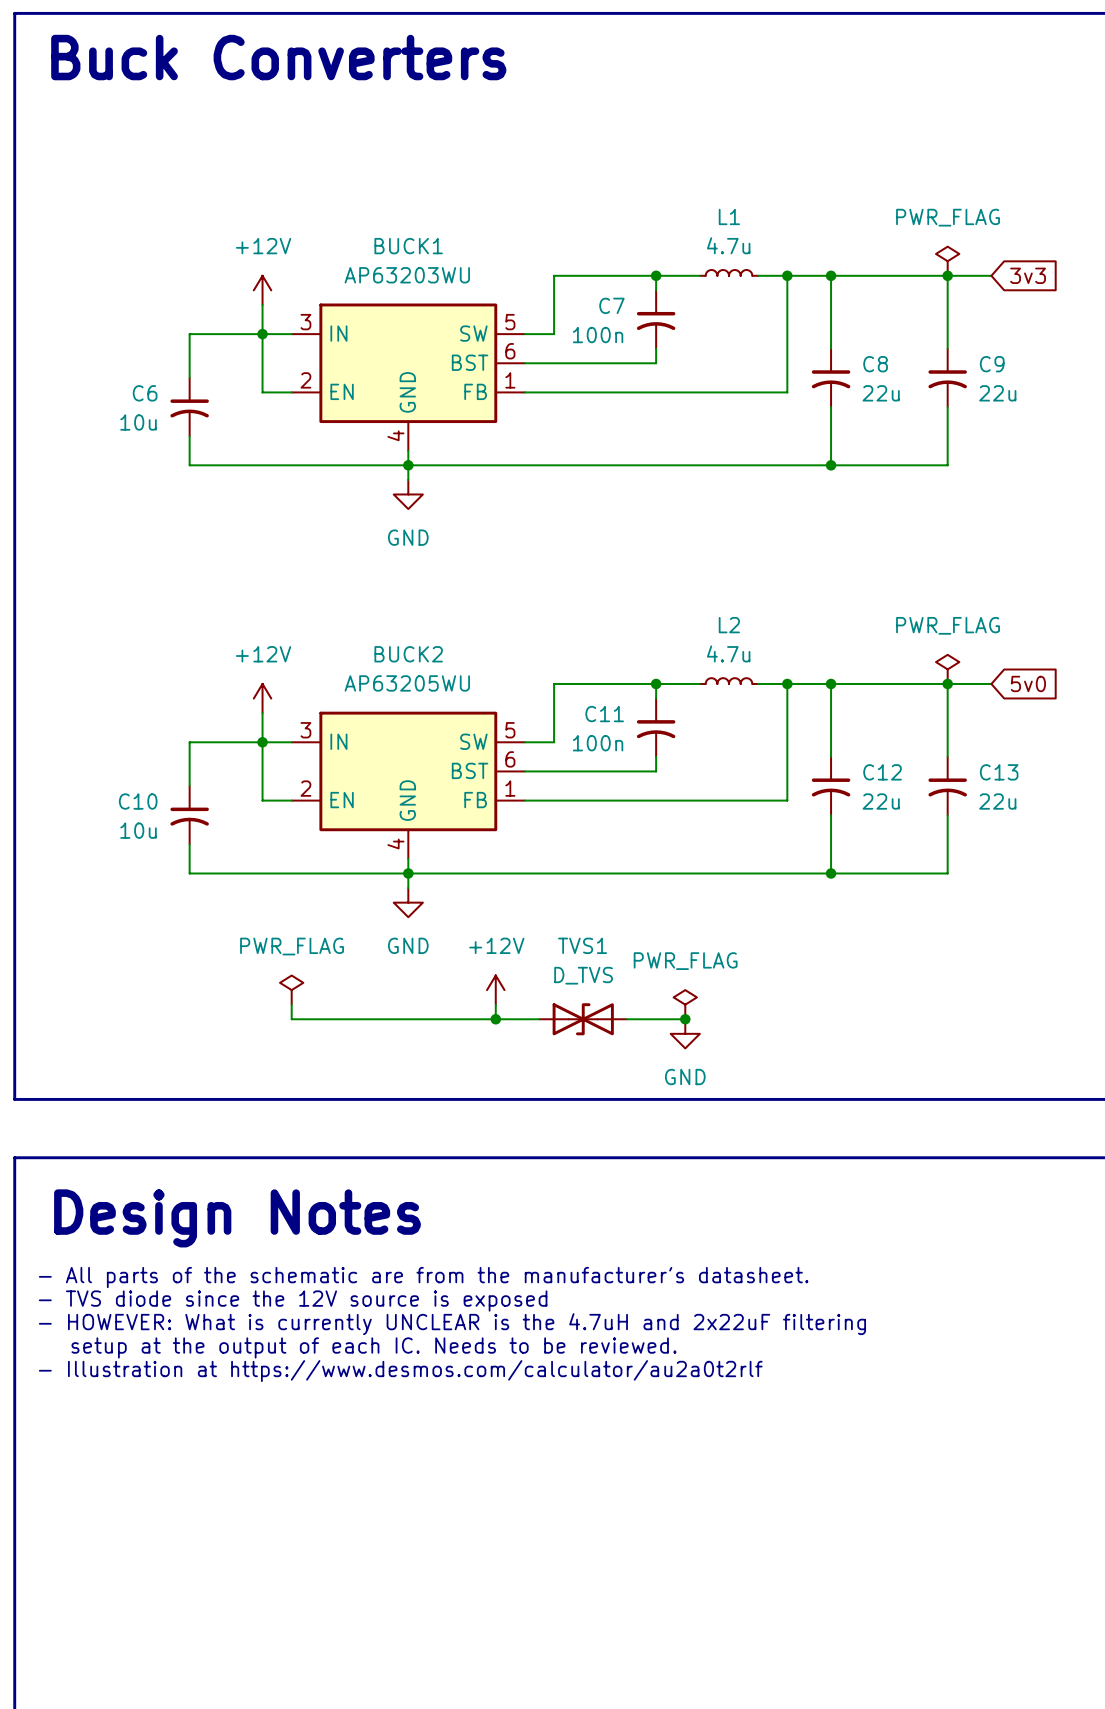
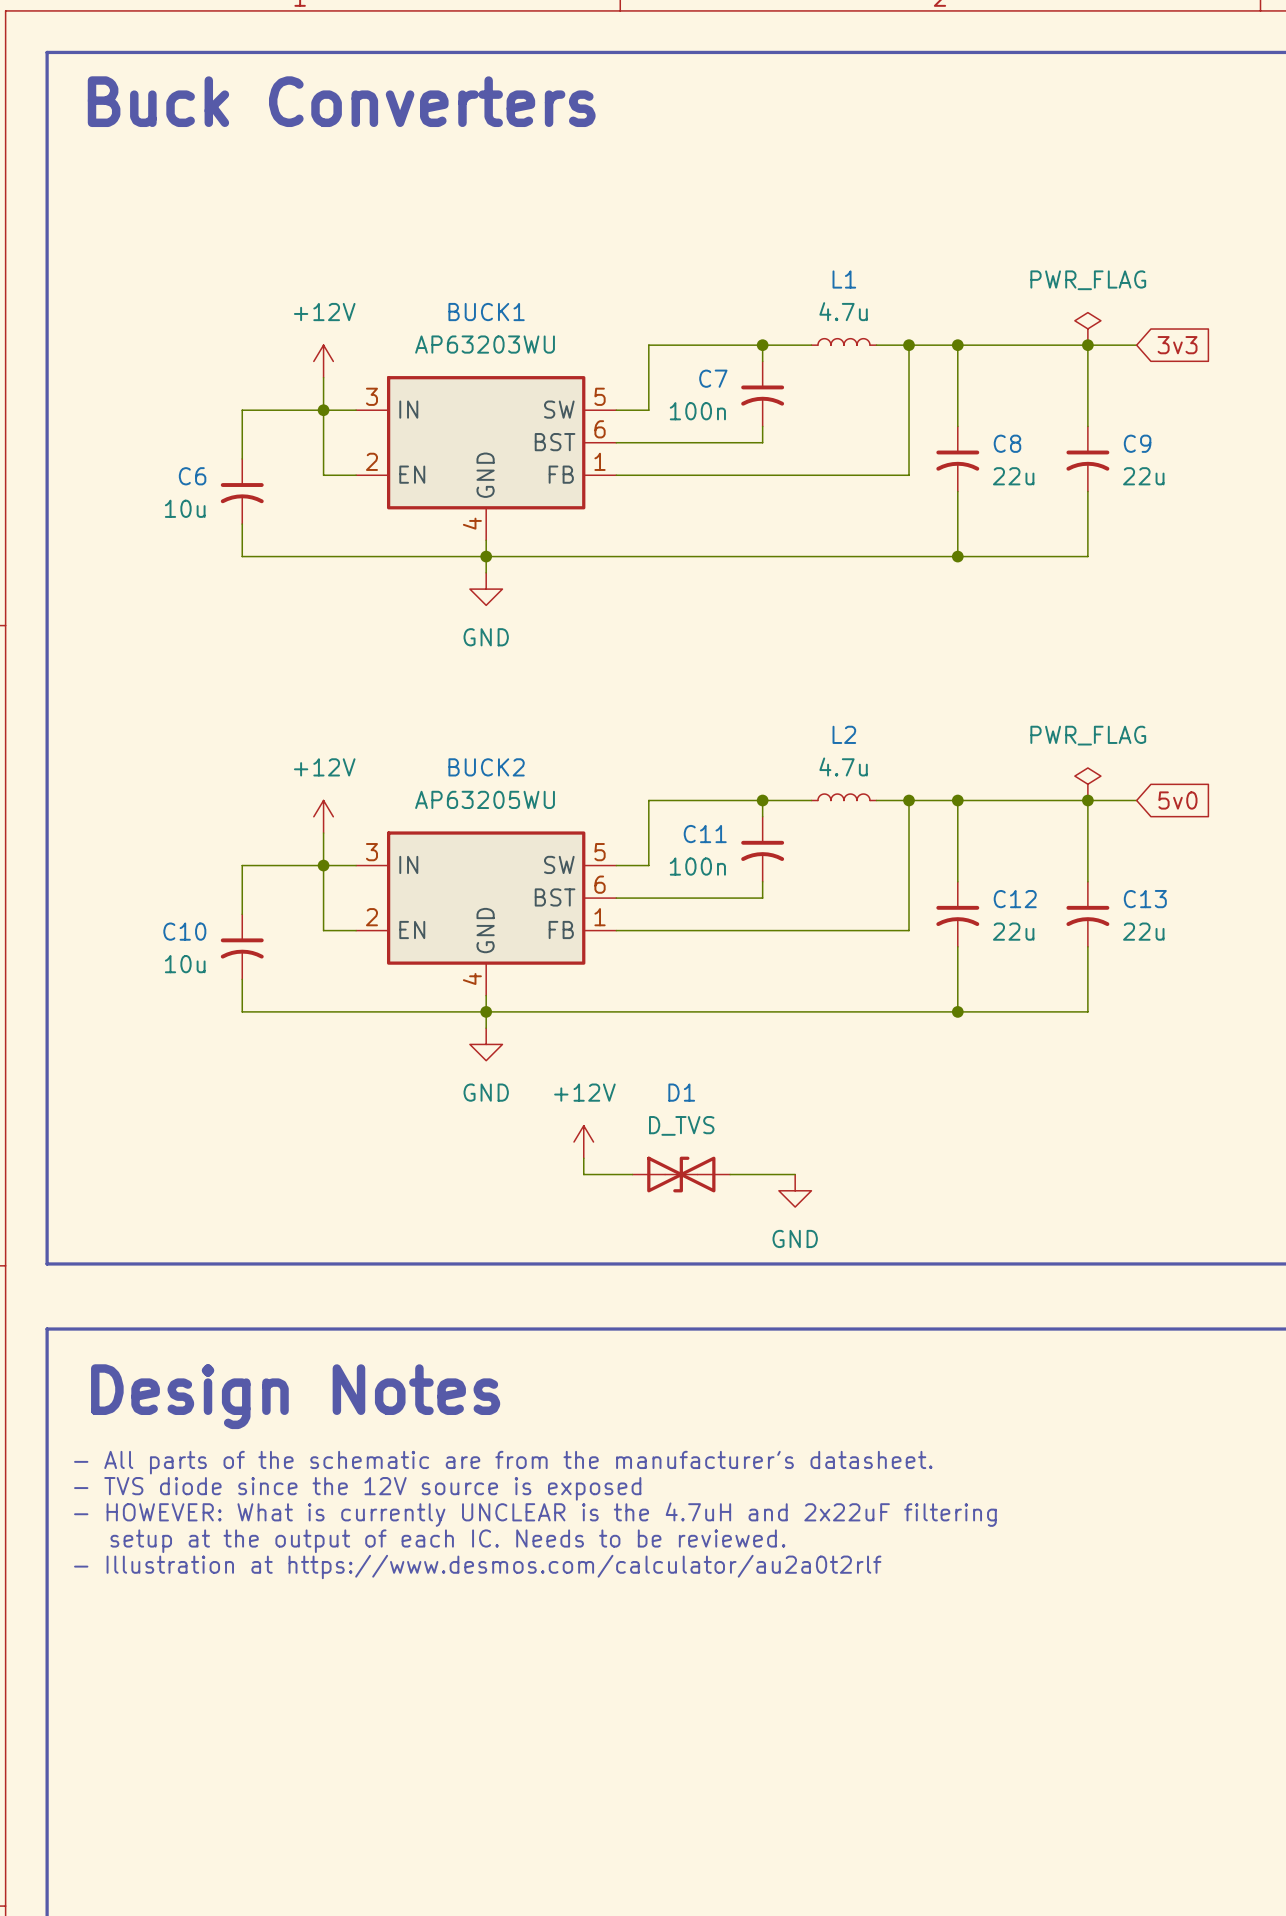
TVS1 name: TVS1 (582, 945) -> D1 (681, 1092)
power symbol: PWR_FLAG (291, 990) -> none
wire: (291, 1004) (291, 1019) (495, 1019) -> none
power symbol: PWR_FLAG (685, 1004) -> none
junction: (495, 1019) -> none
junction: (685, 1019) -> none

